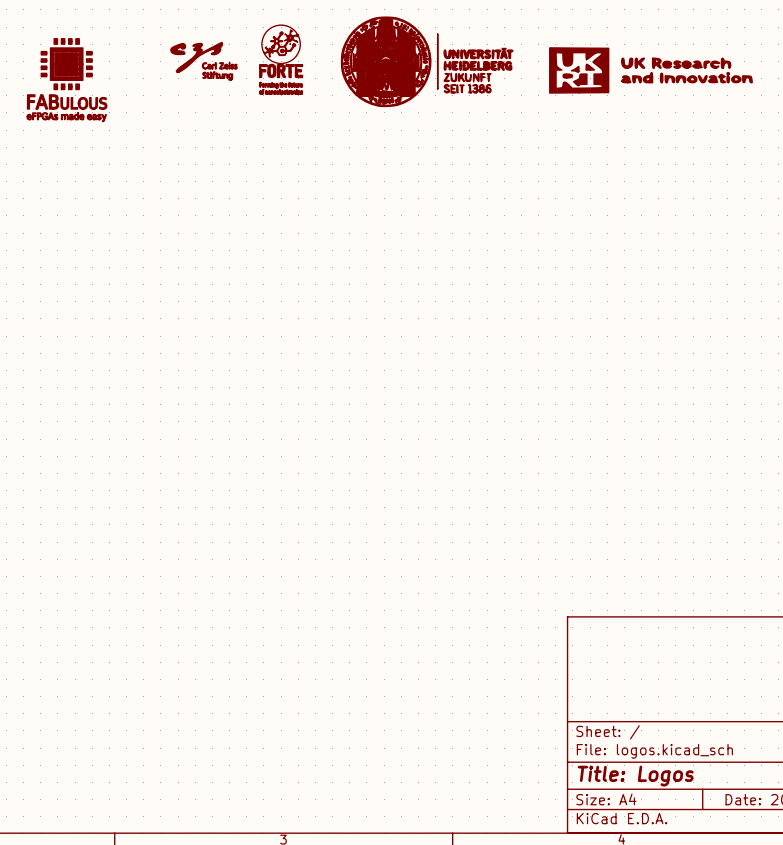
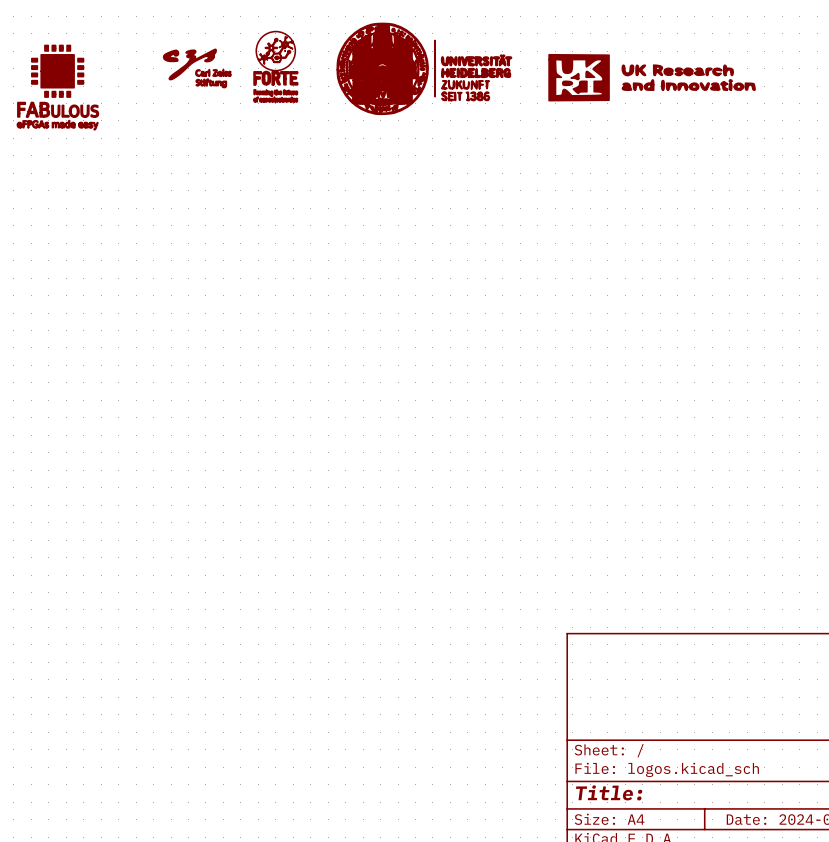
title block: Title: Logos (635, 776) -> Title: (609, 792)

